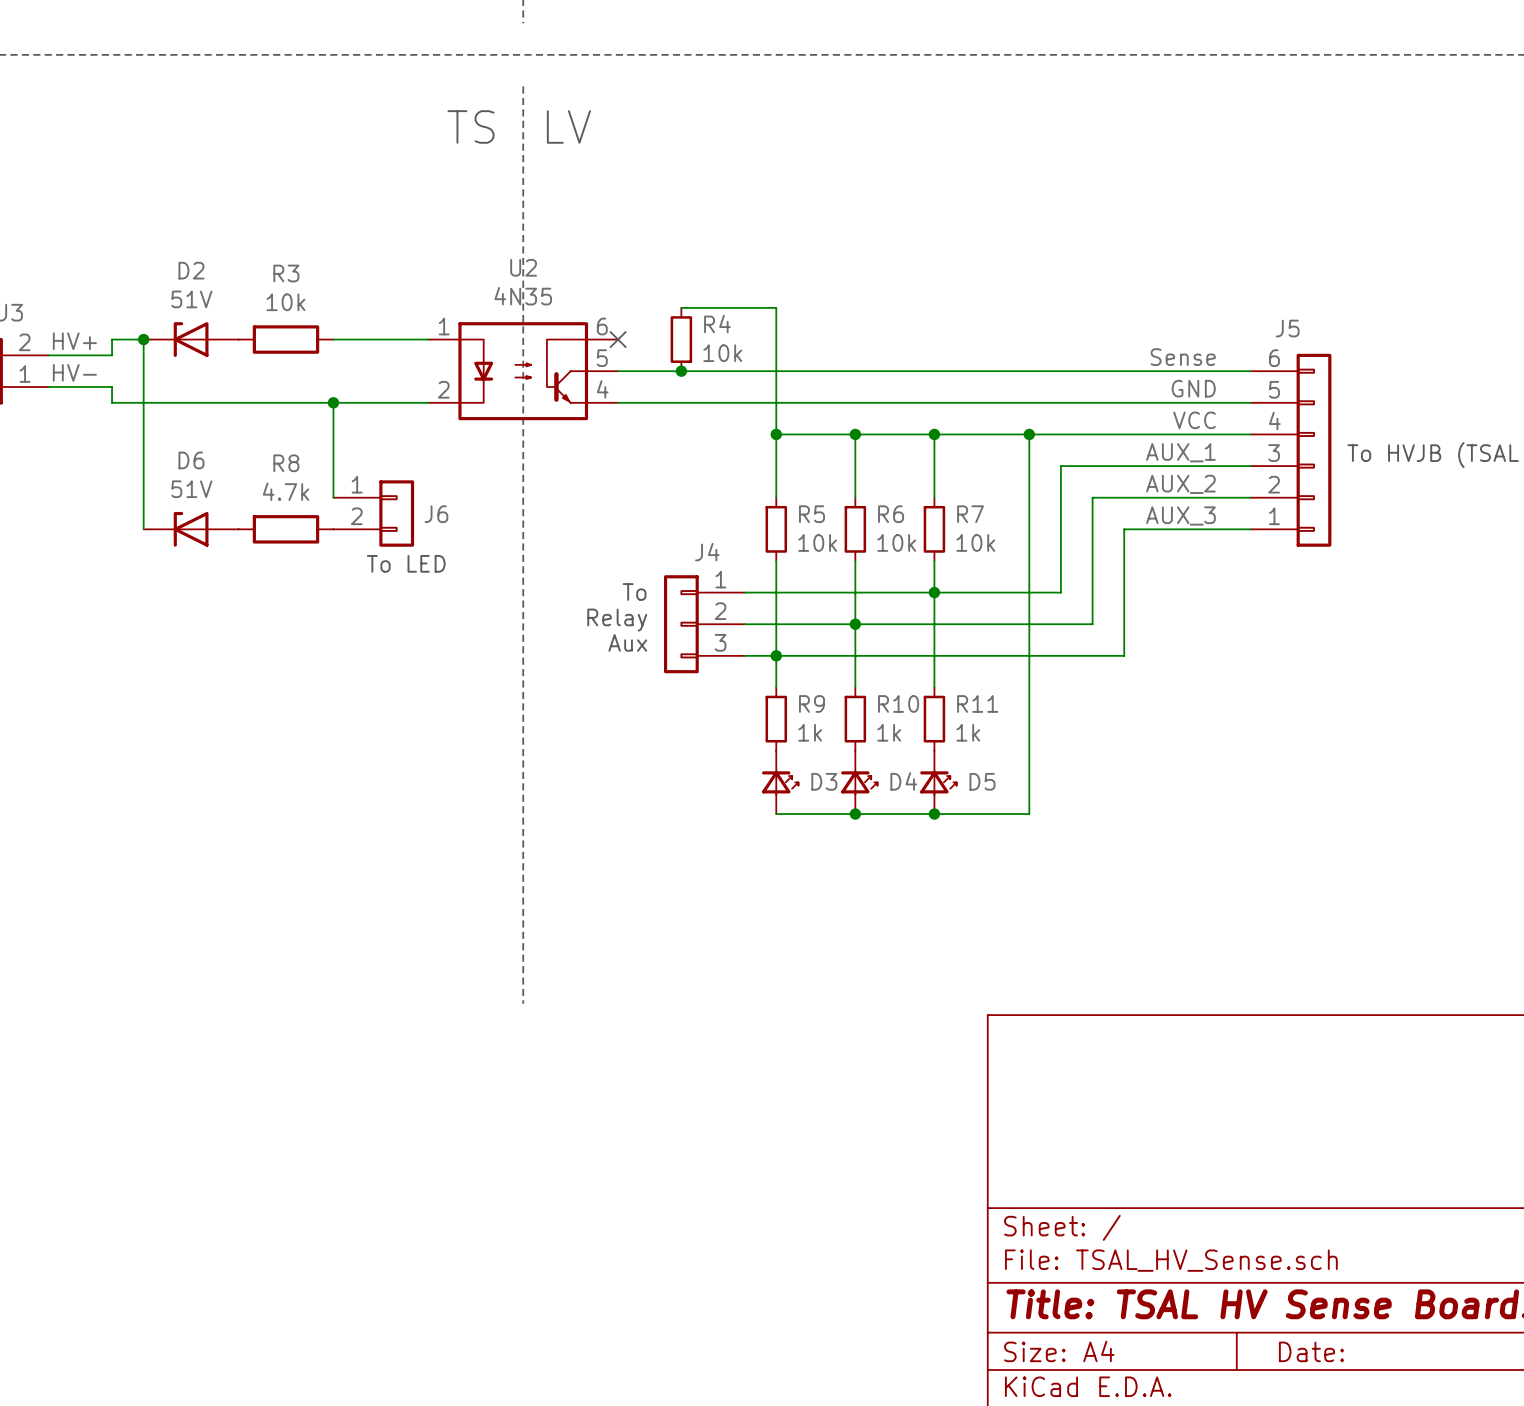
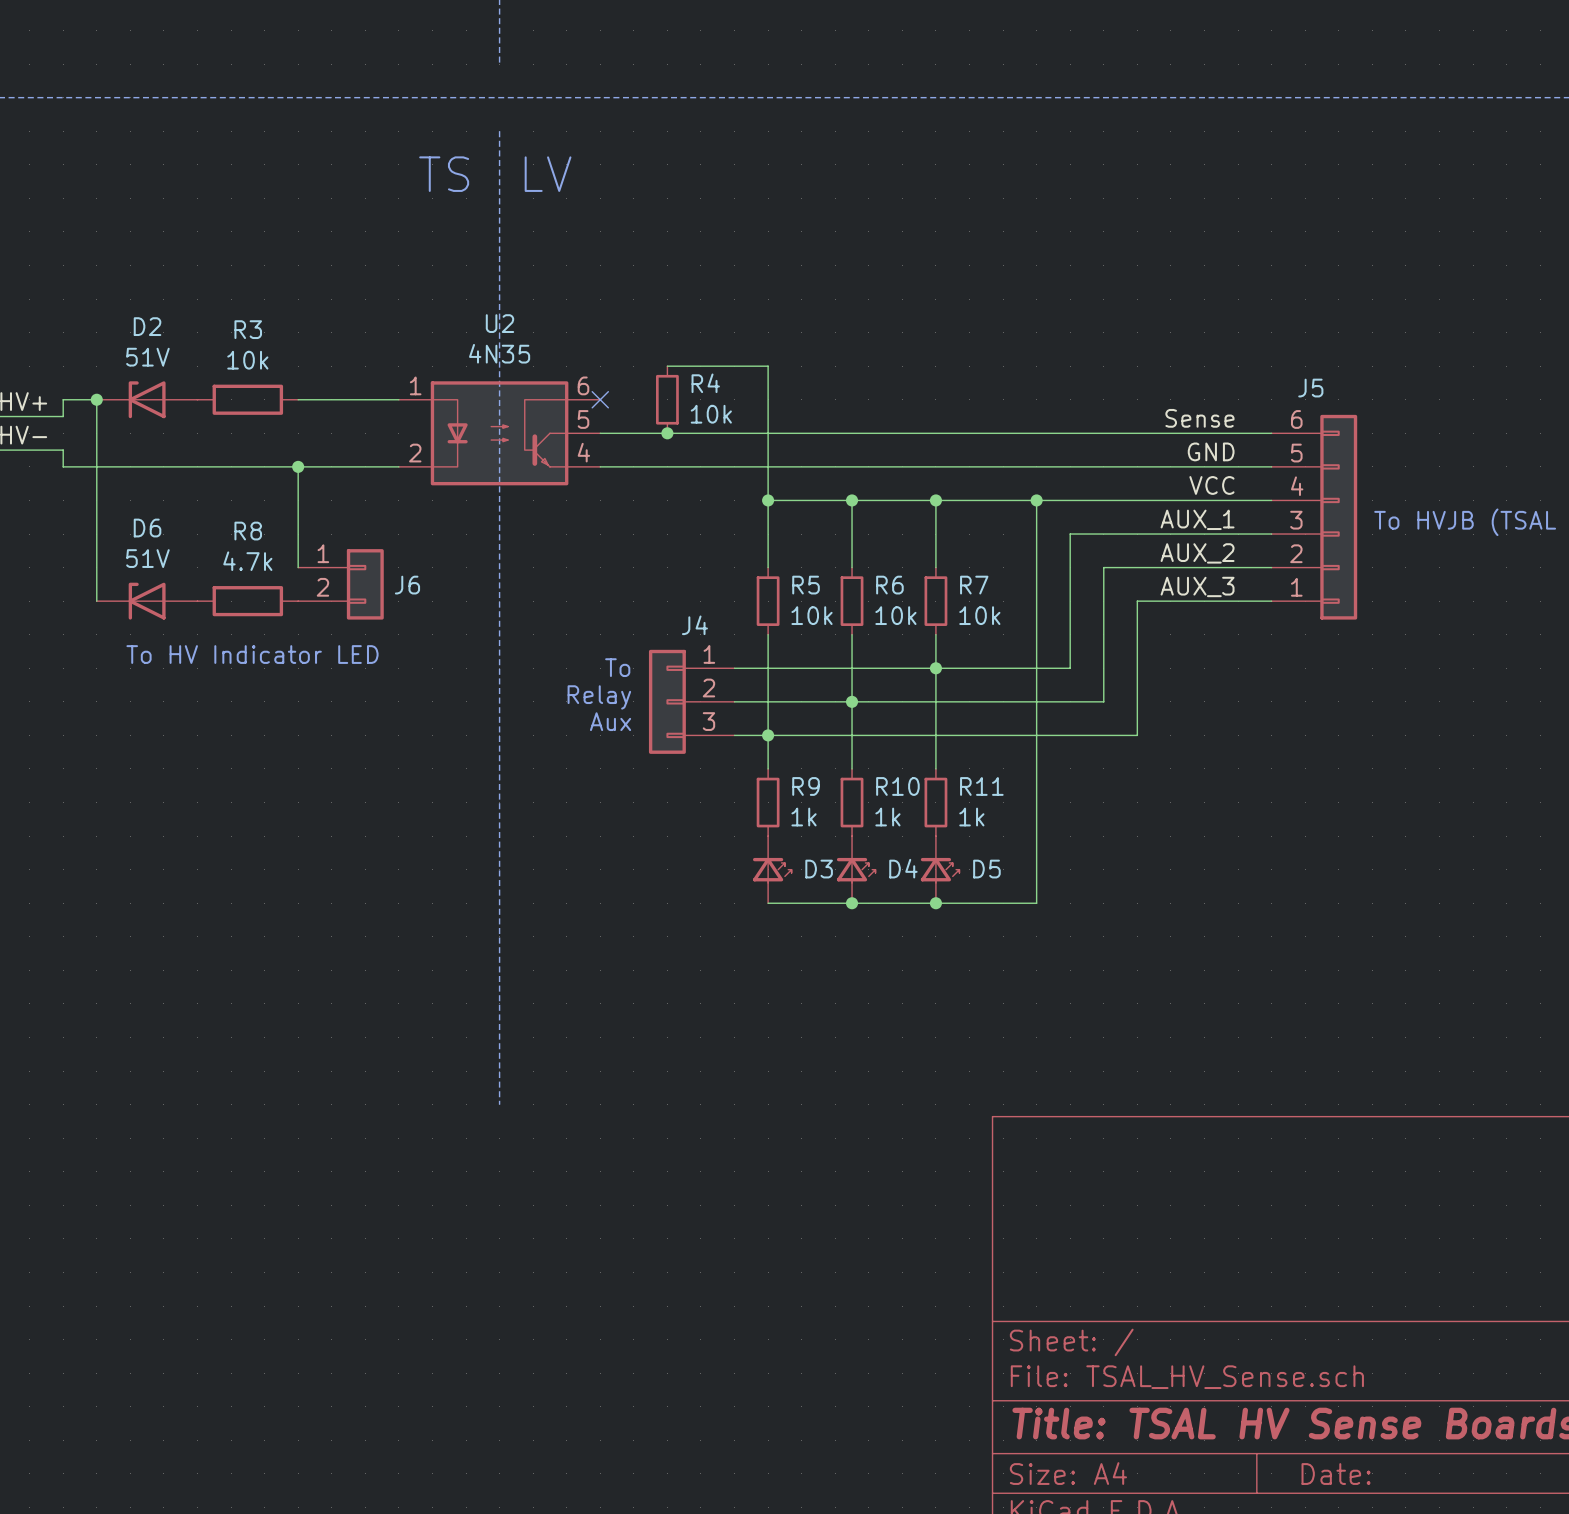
text: To LED (406, 563) -> none
text: none -> To HV Indicator LED (252, 654)

